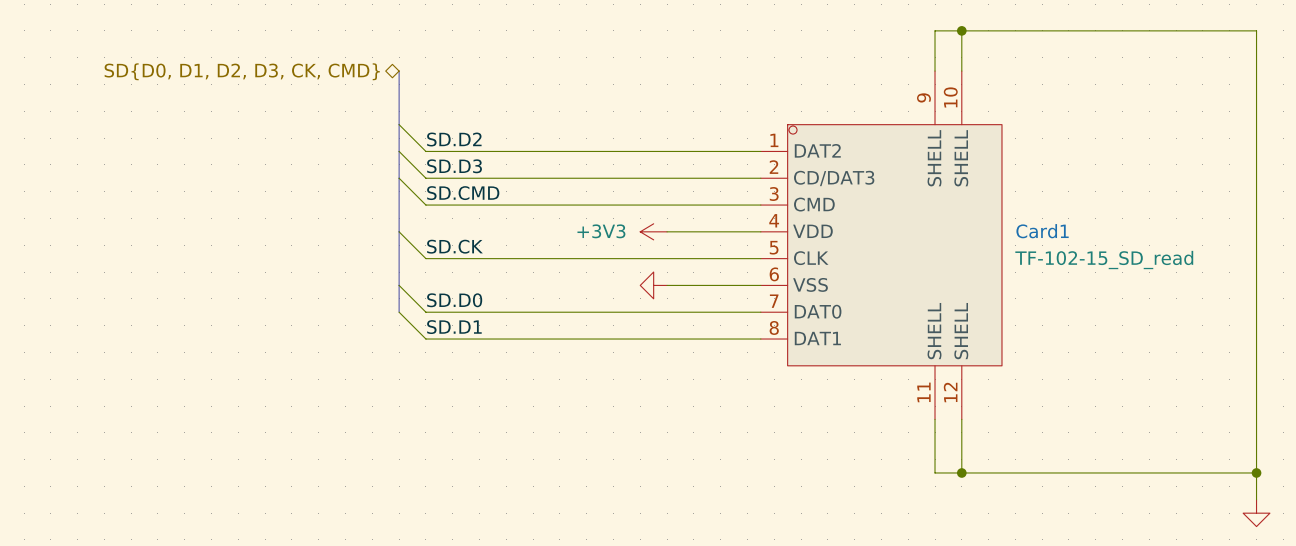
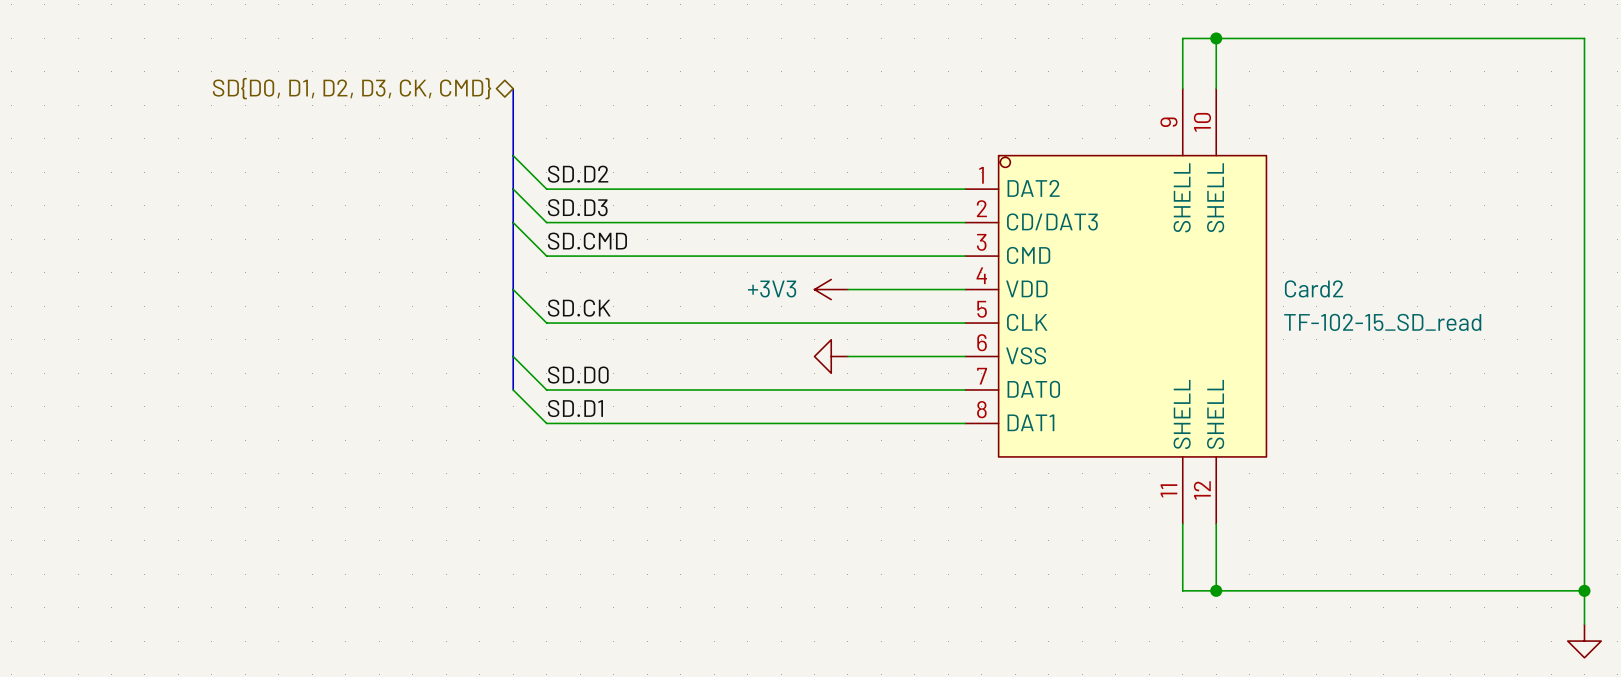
Card1 name: Card1 (1042, 231) -> Card2 (1314, 288)

